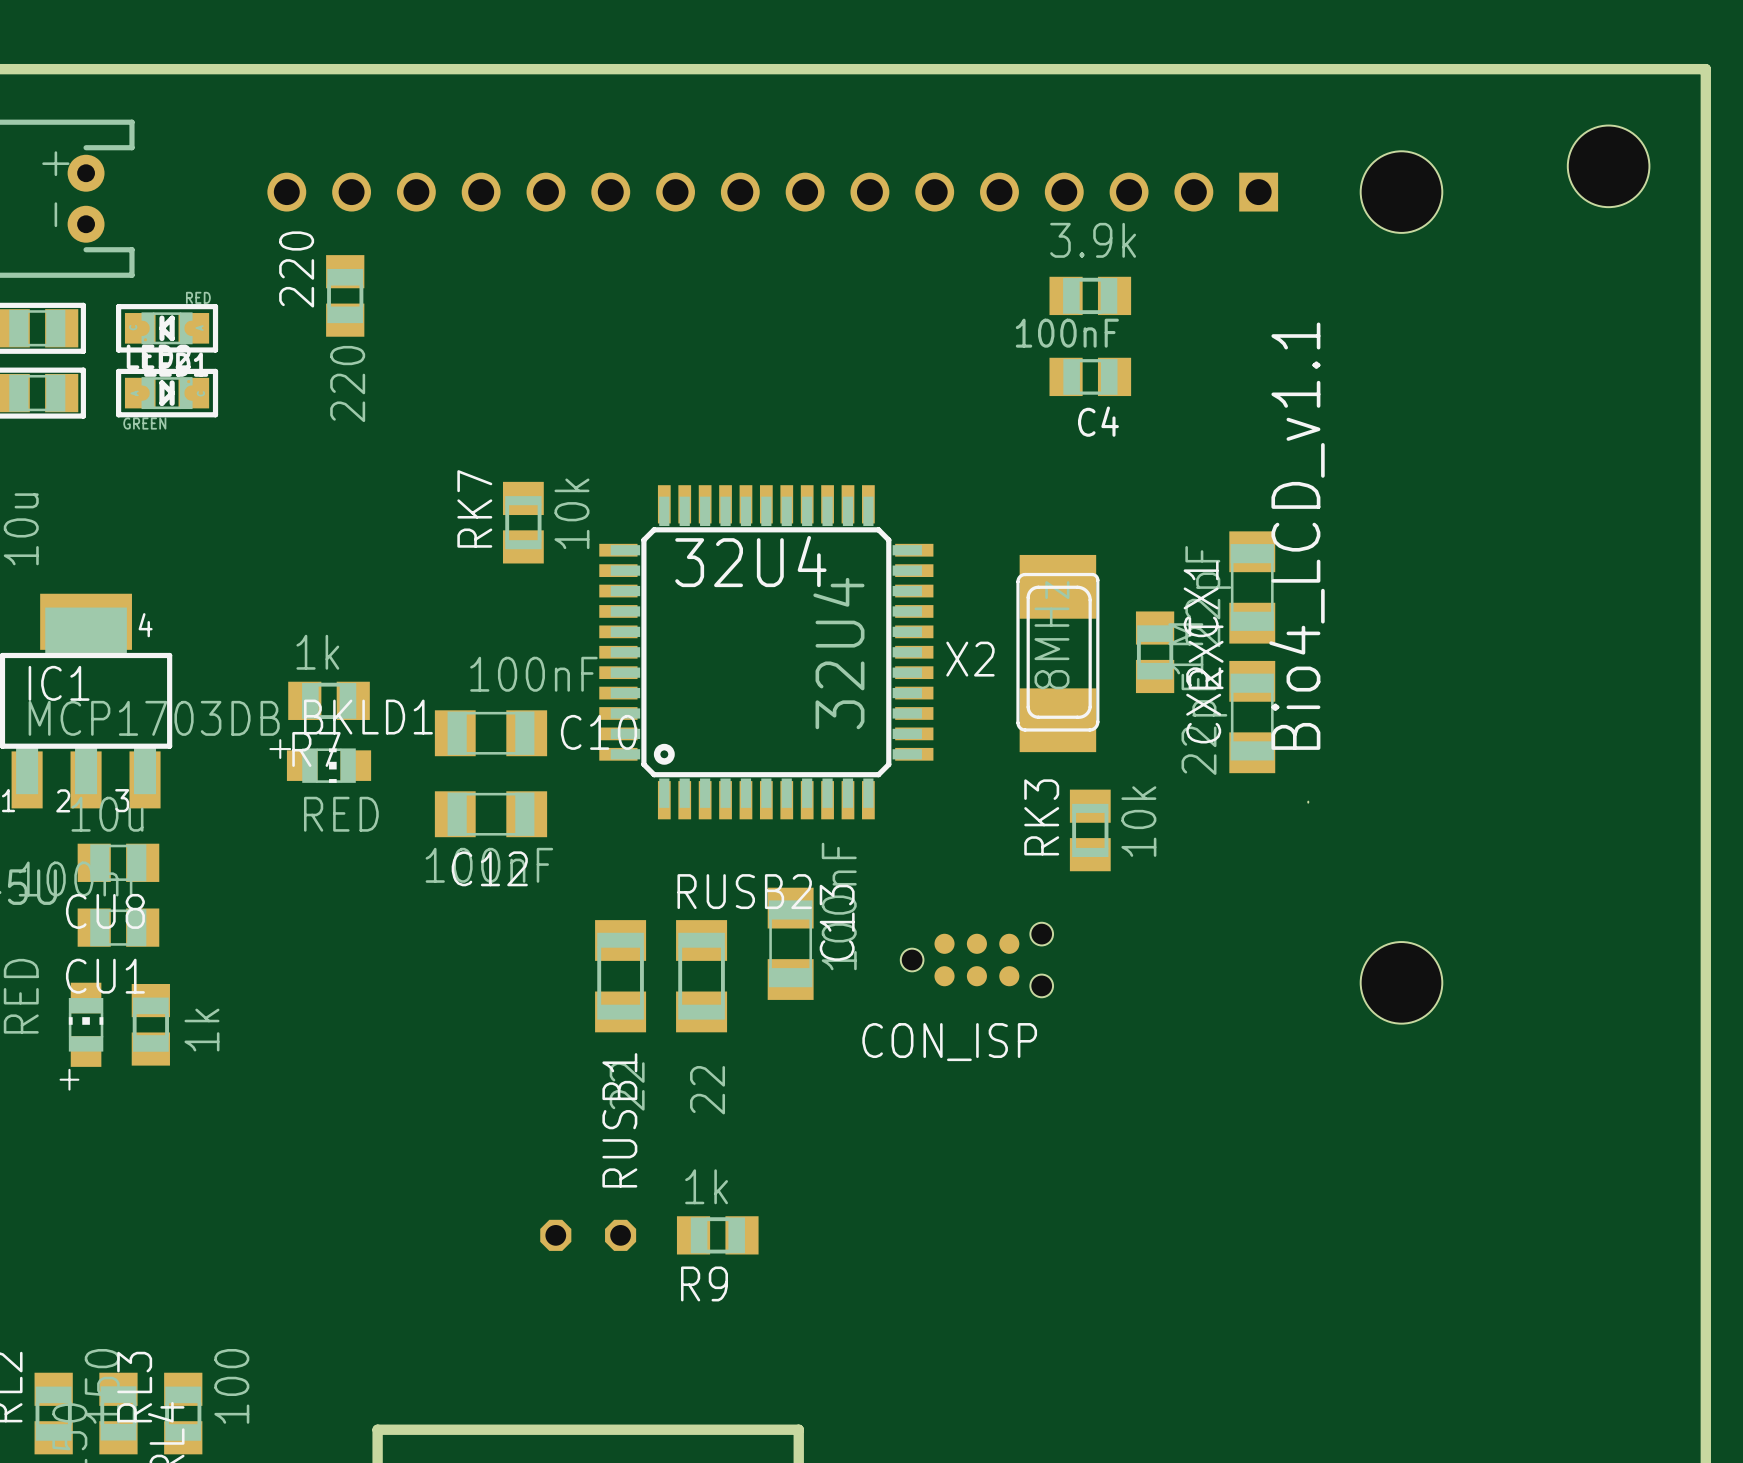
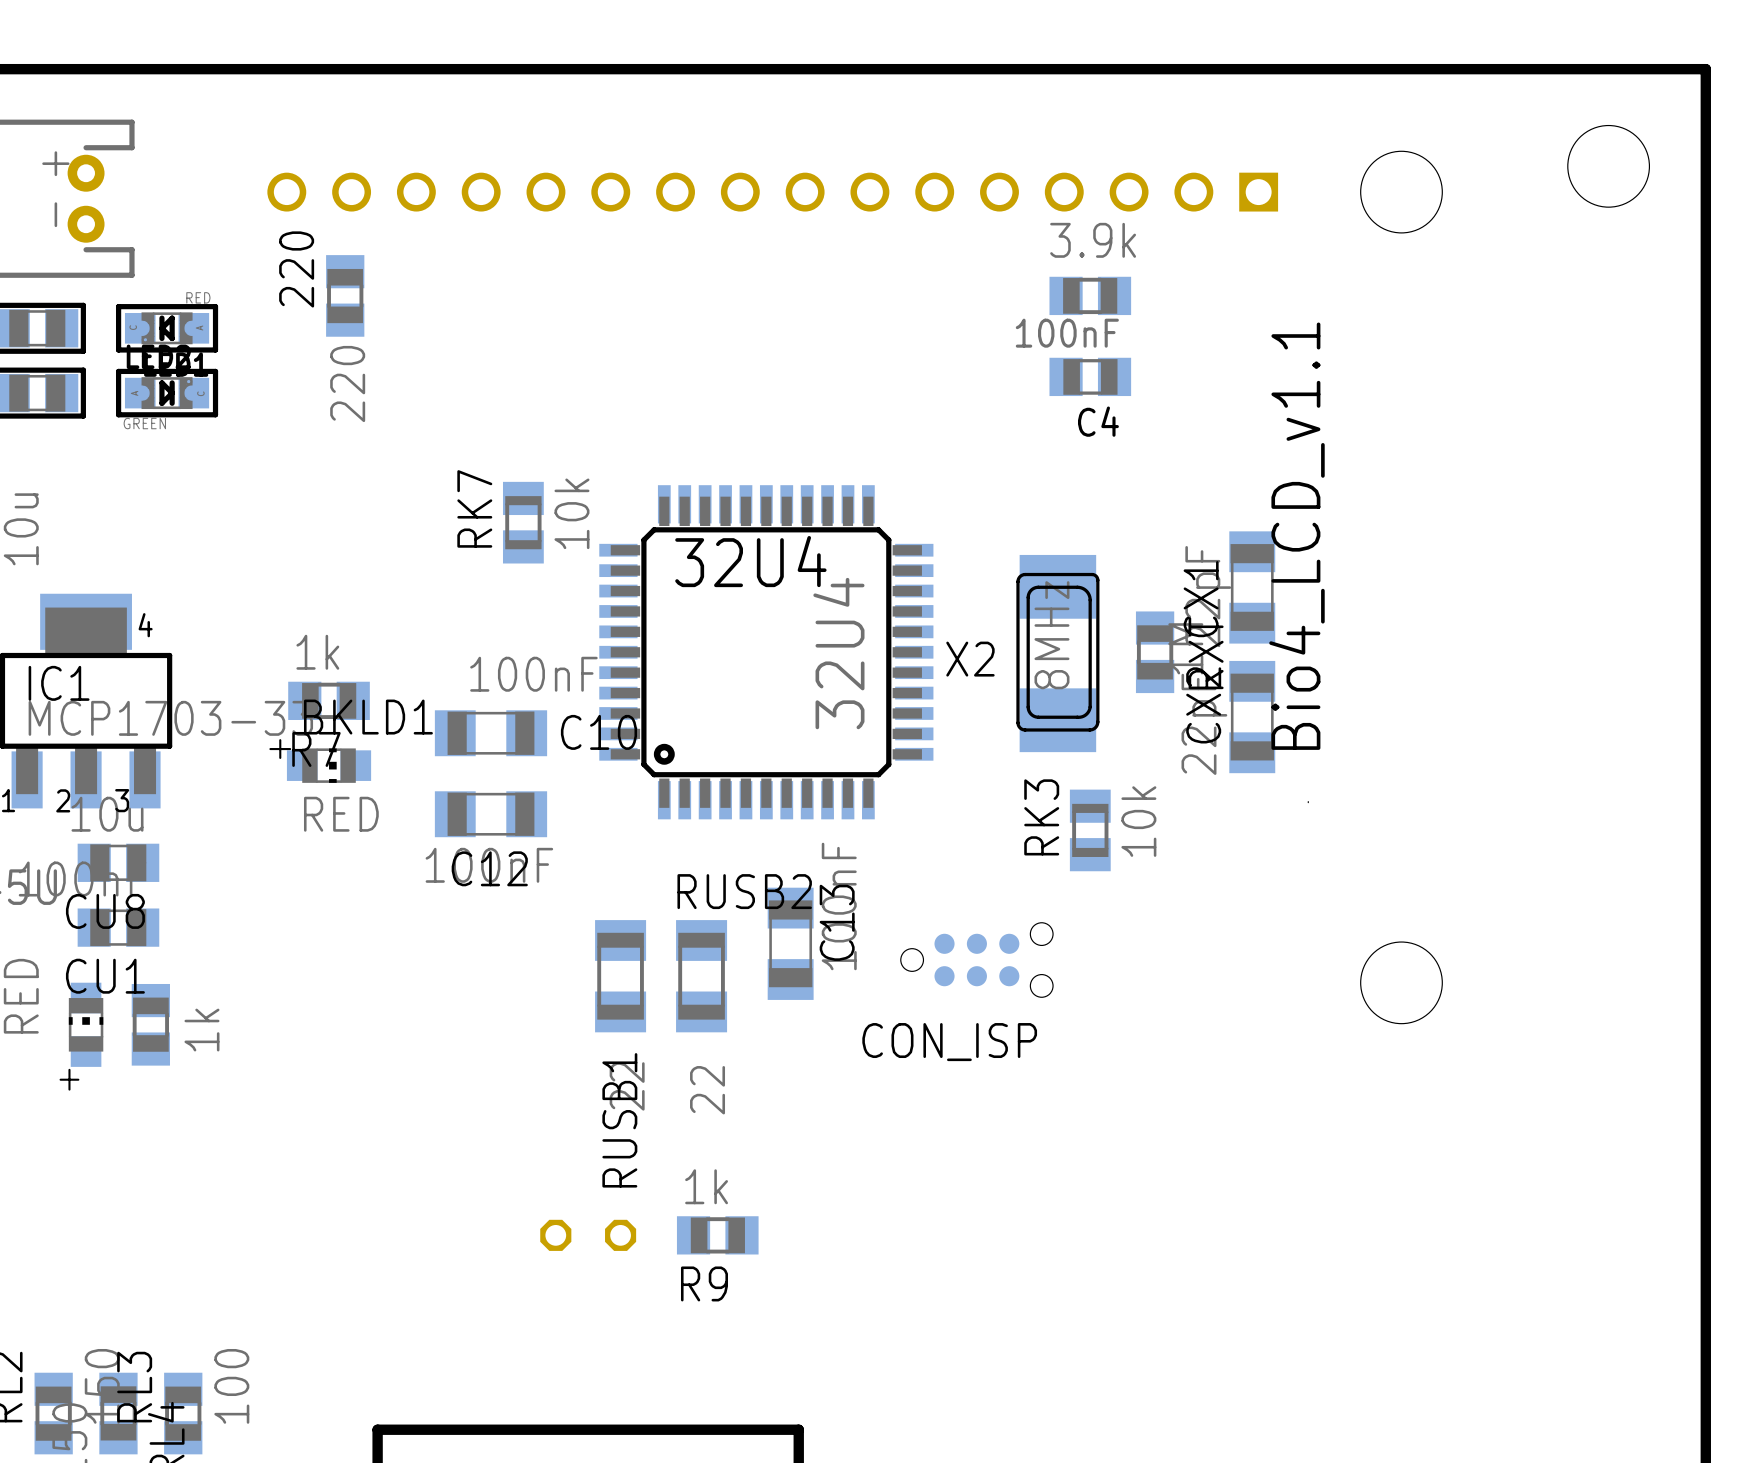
IC1 value: MCP1703DB (154, 718) -> MCP1703-33 (170, 718)

